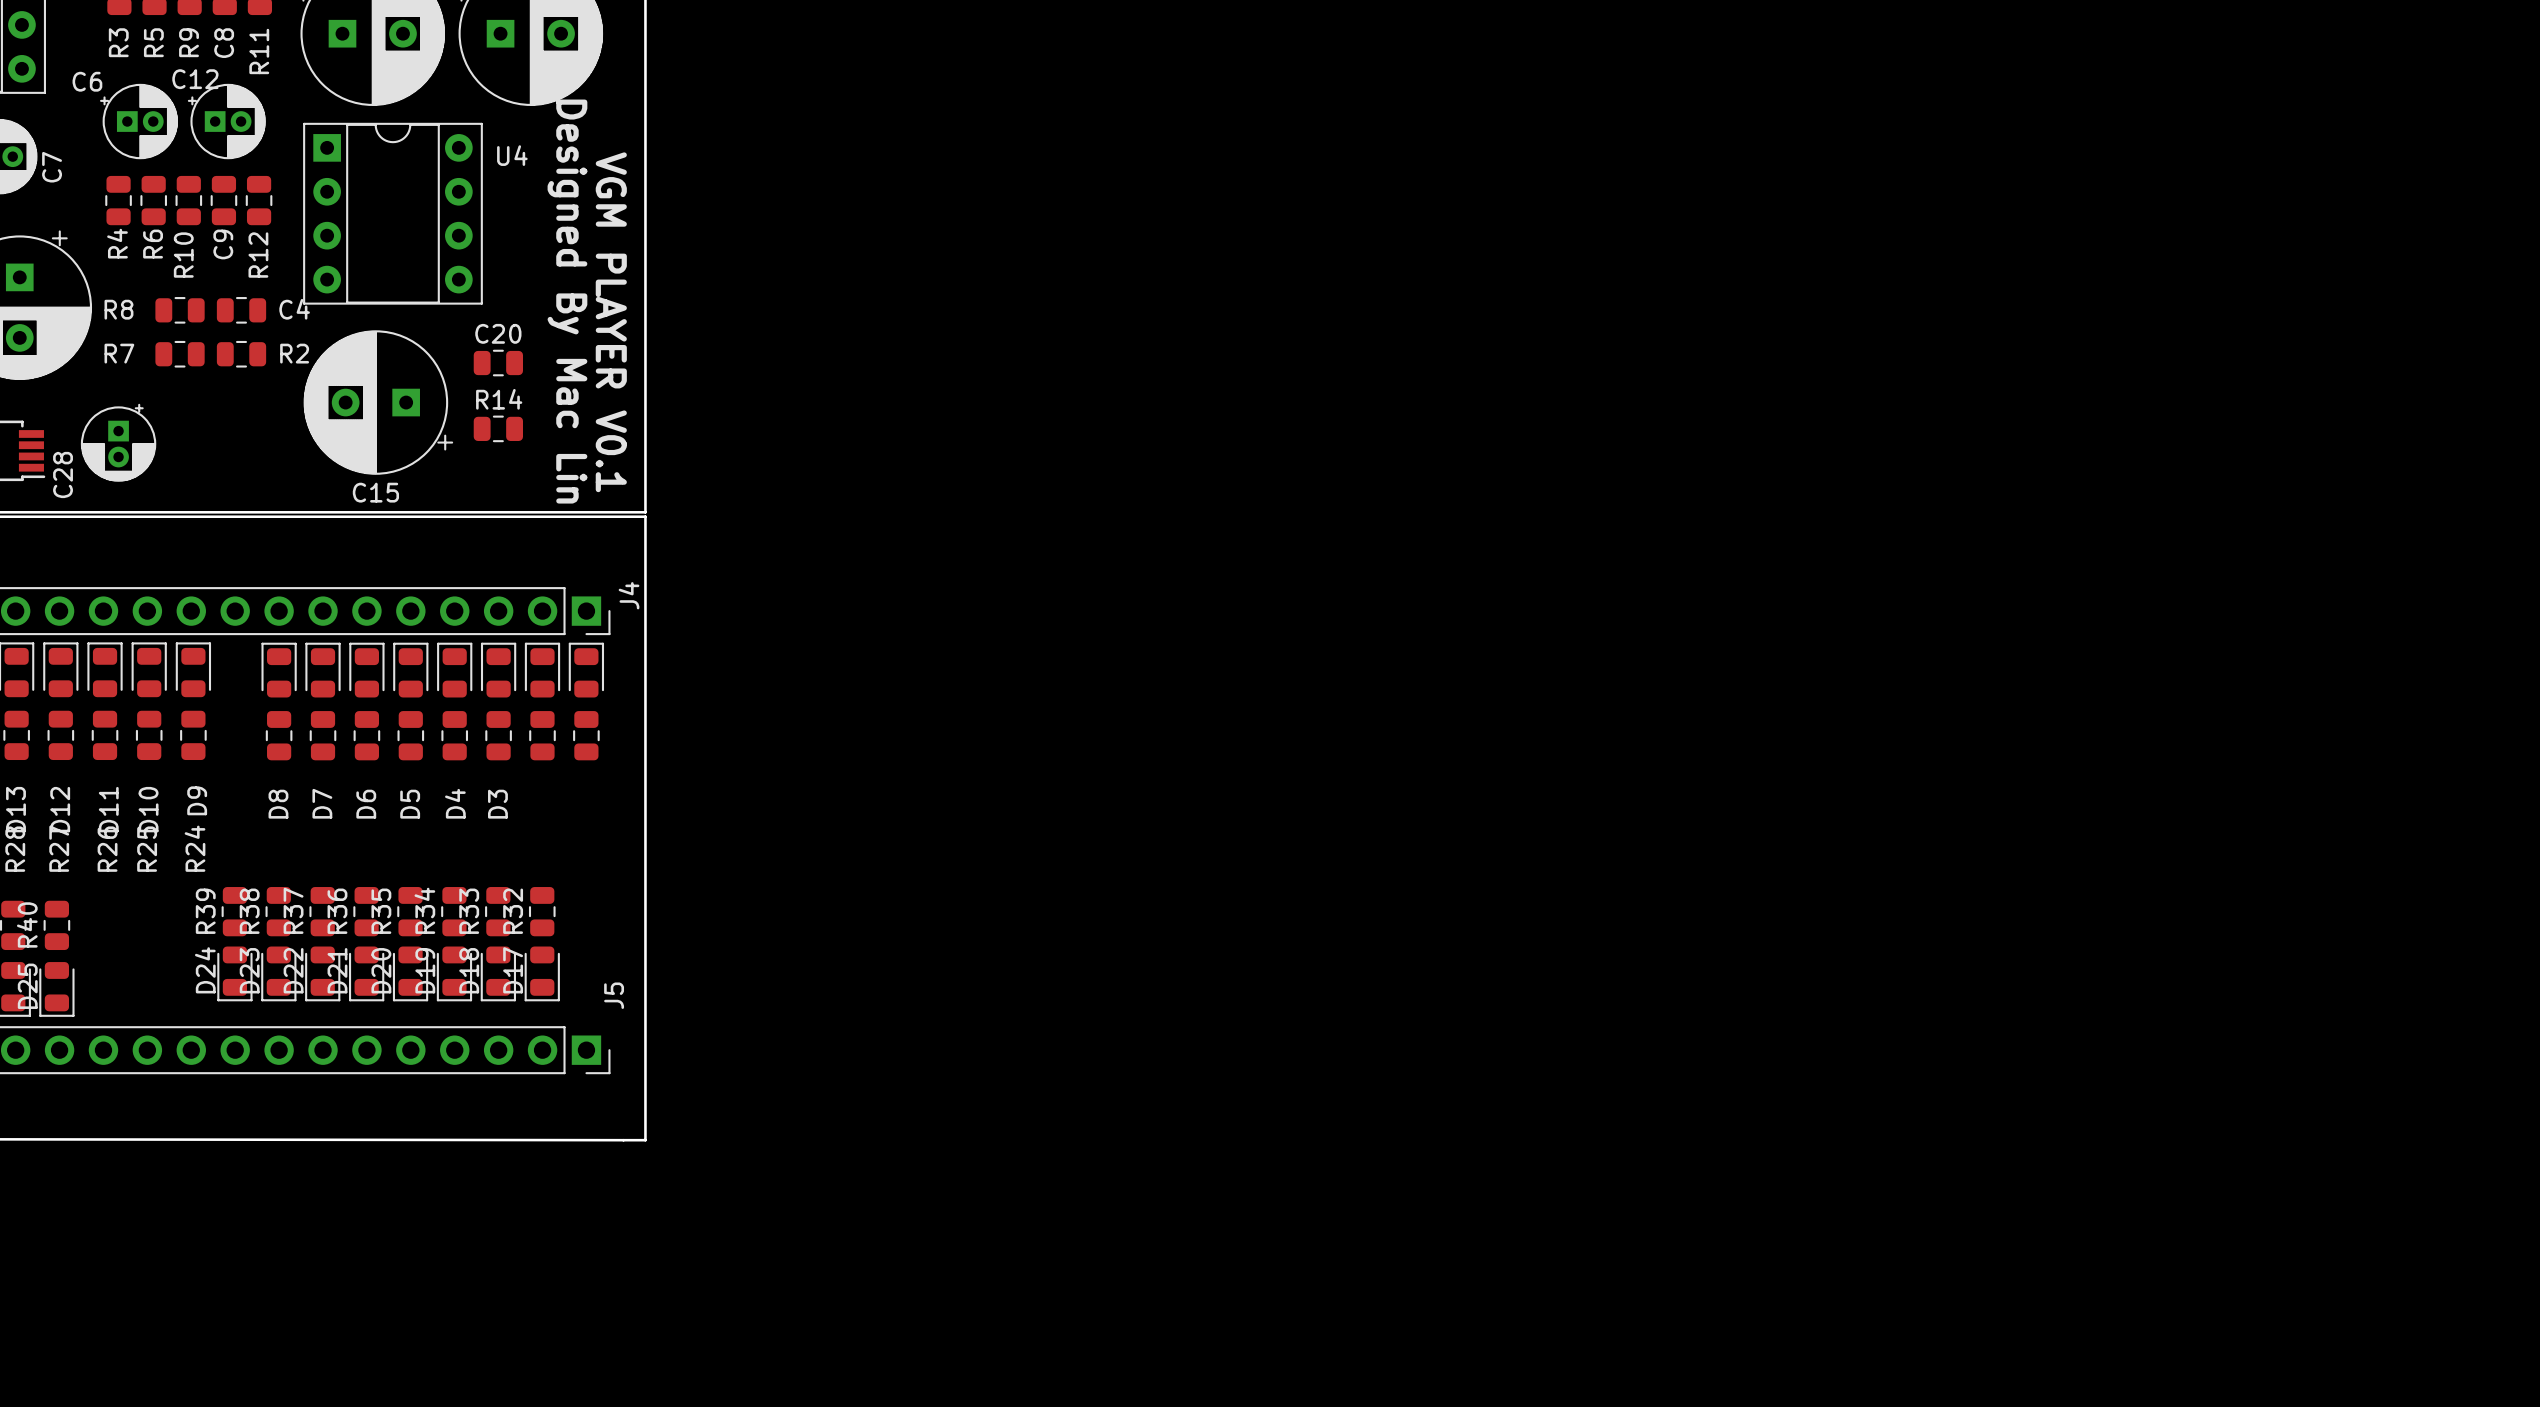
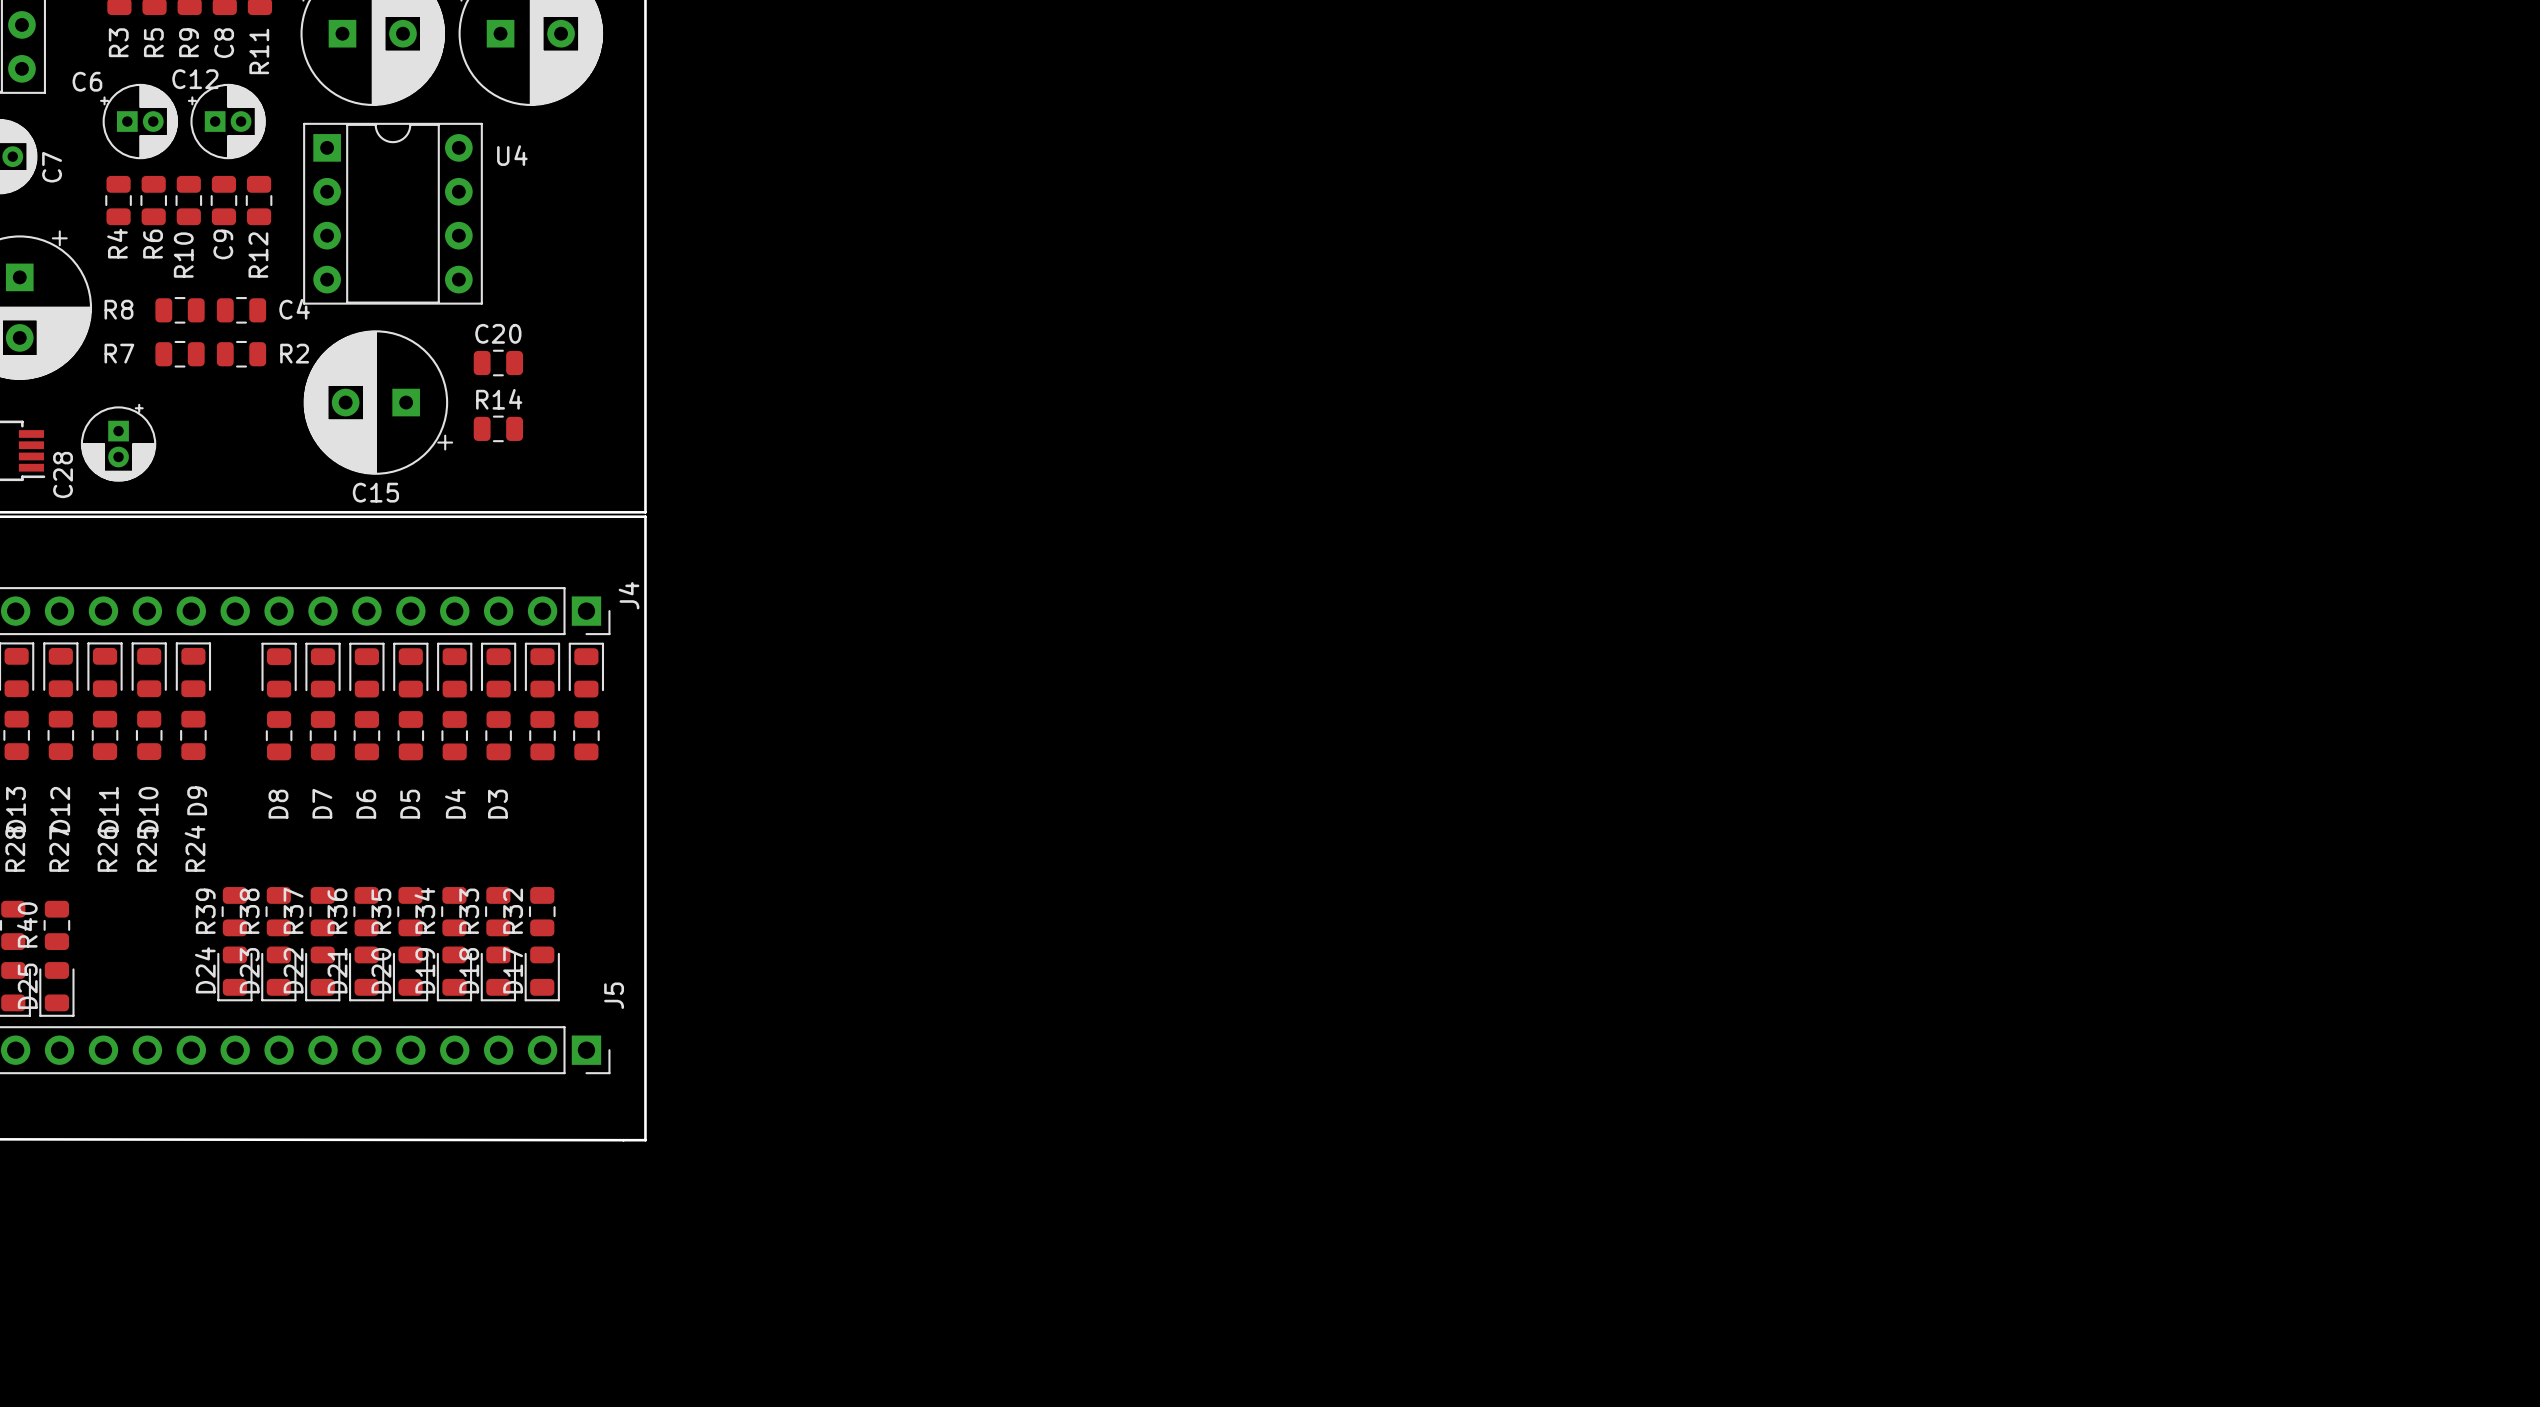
text: Designed By Mac Lin (567, 301) -> none
text: VGM PLAYER V0.1 (611, 322) -> none

